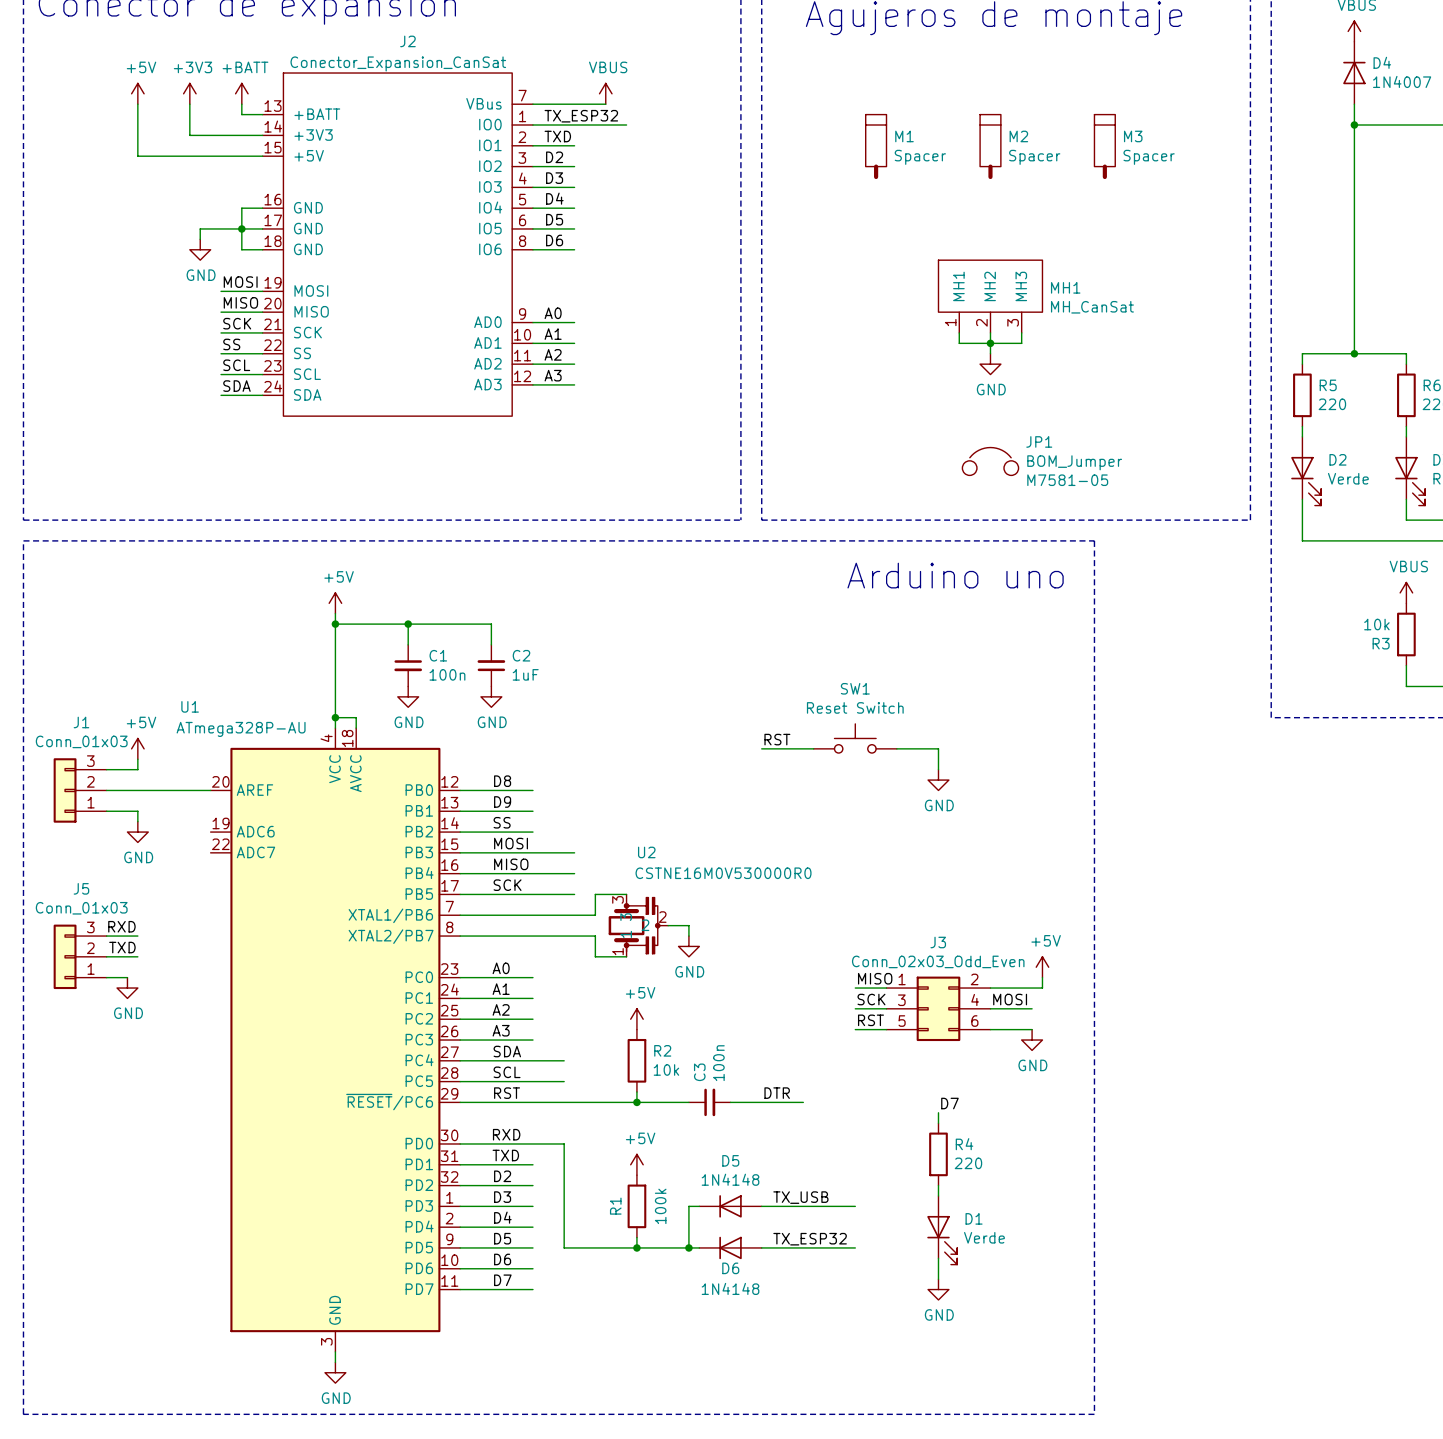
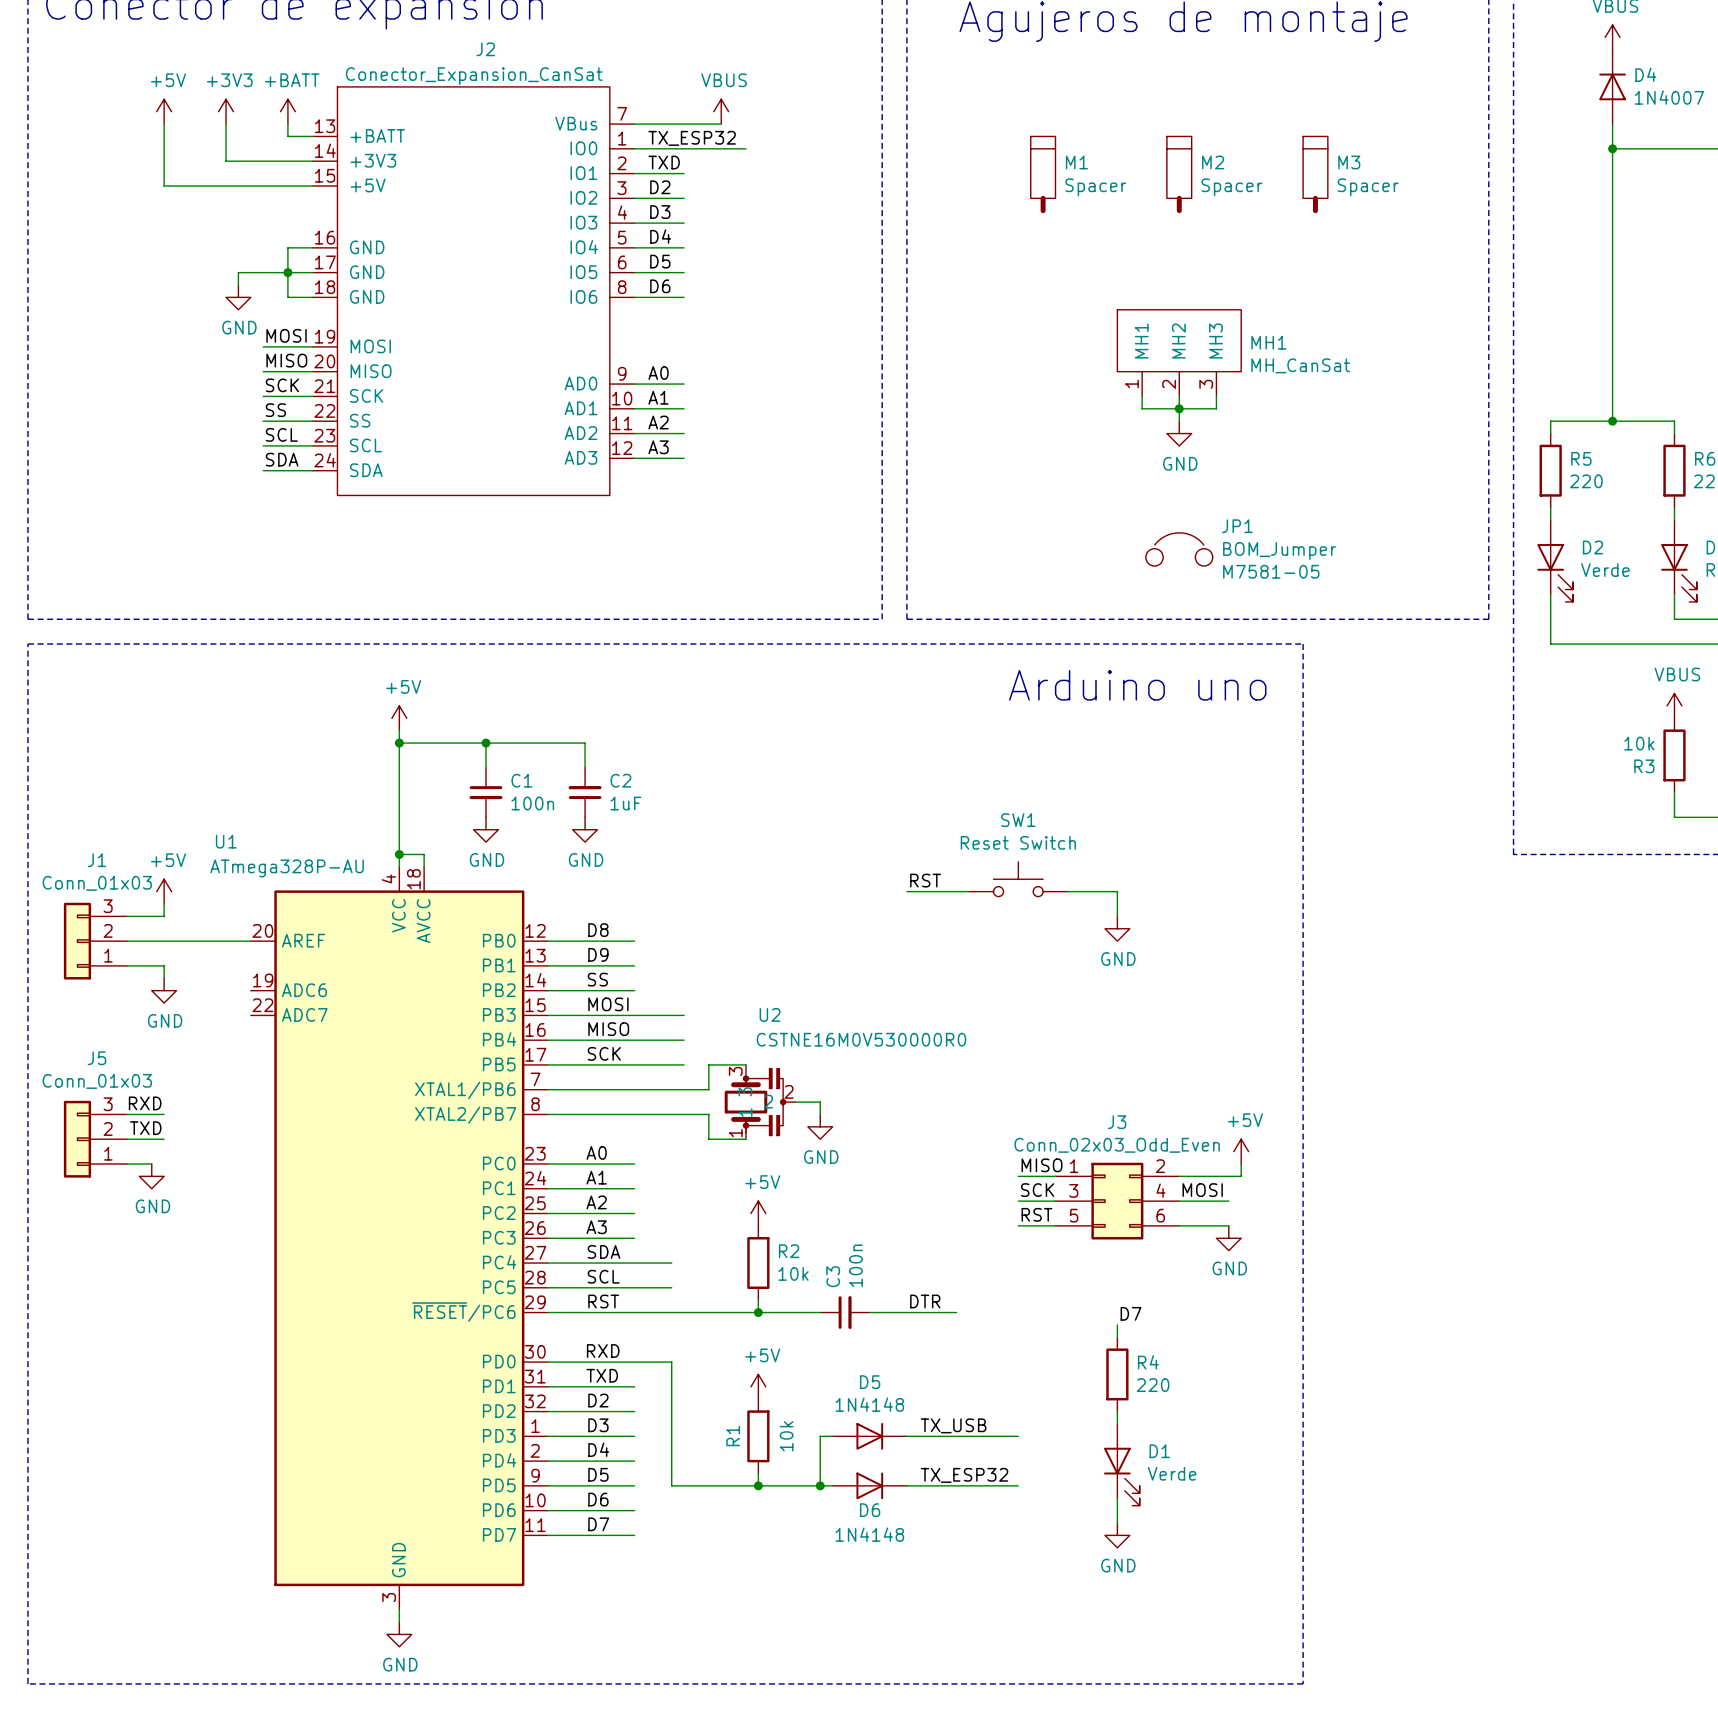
R1 value: 100k (660, 1206) -> 10k (786, 1436)
D5 rotation: 0° (730, 1206) -> 180° (869, 1436)
D6 rotation: 0° (730, 1247) -> 180° (869, 1485)

